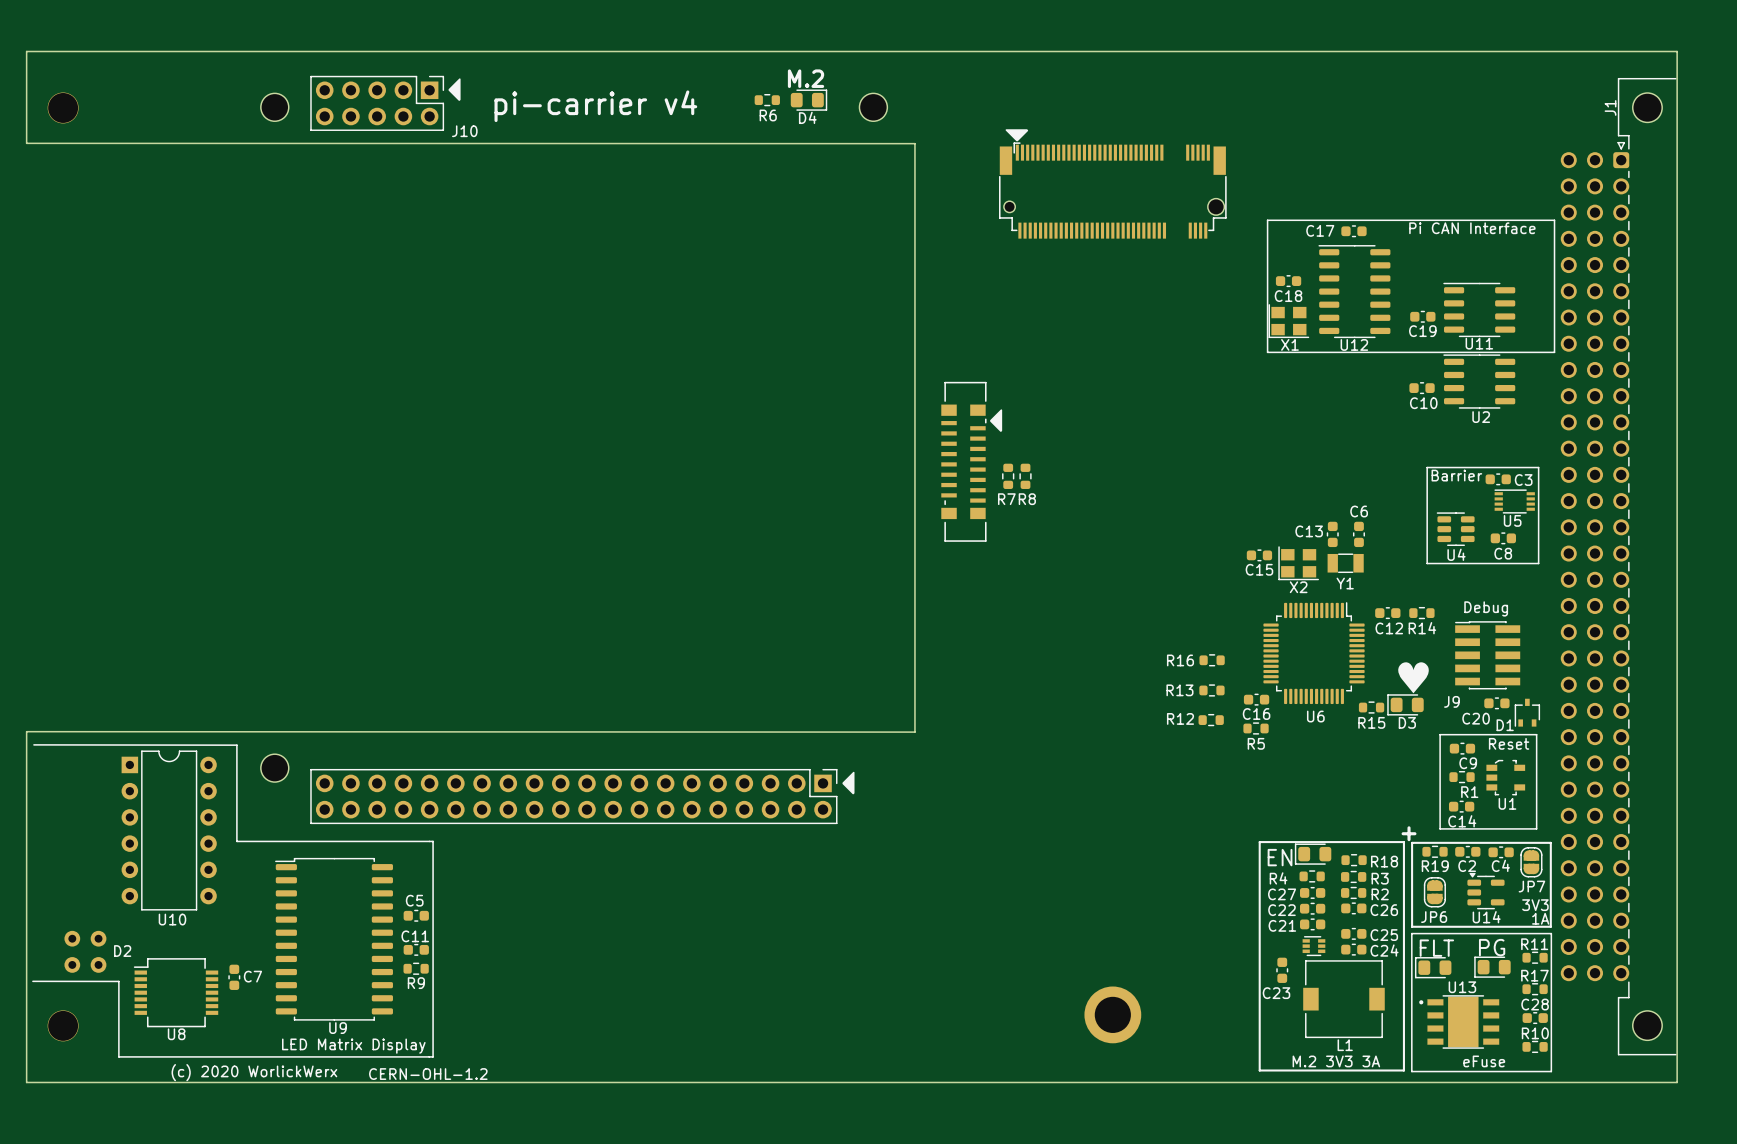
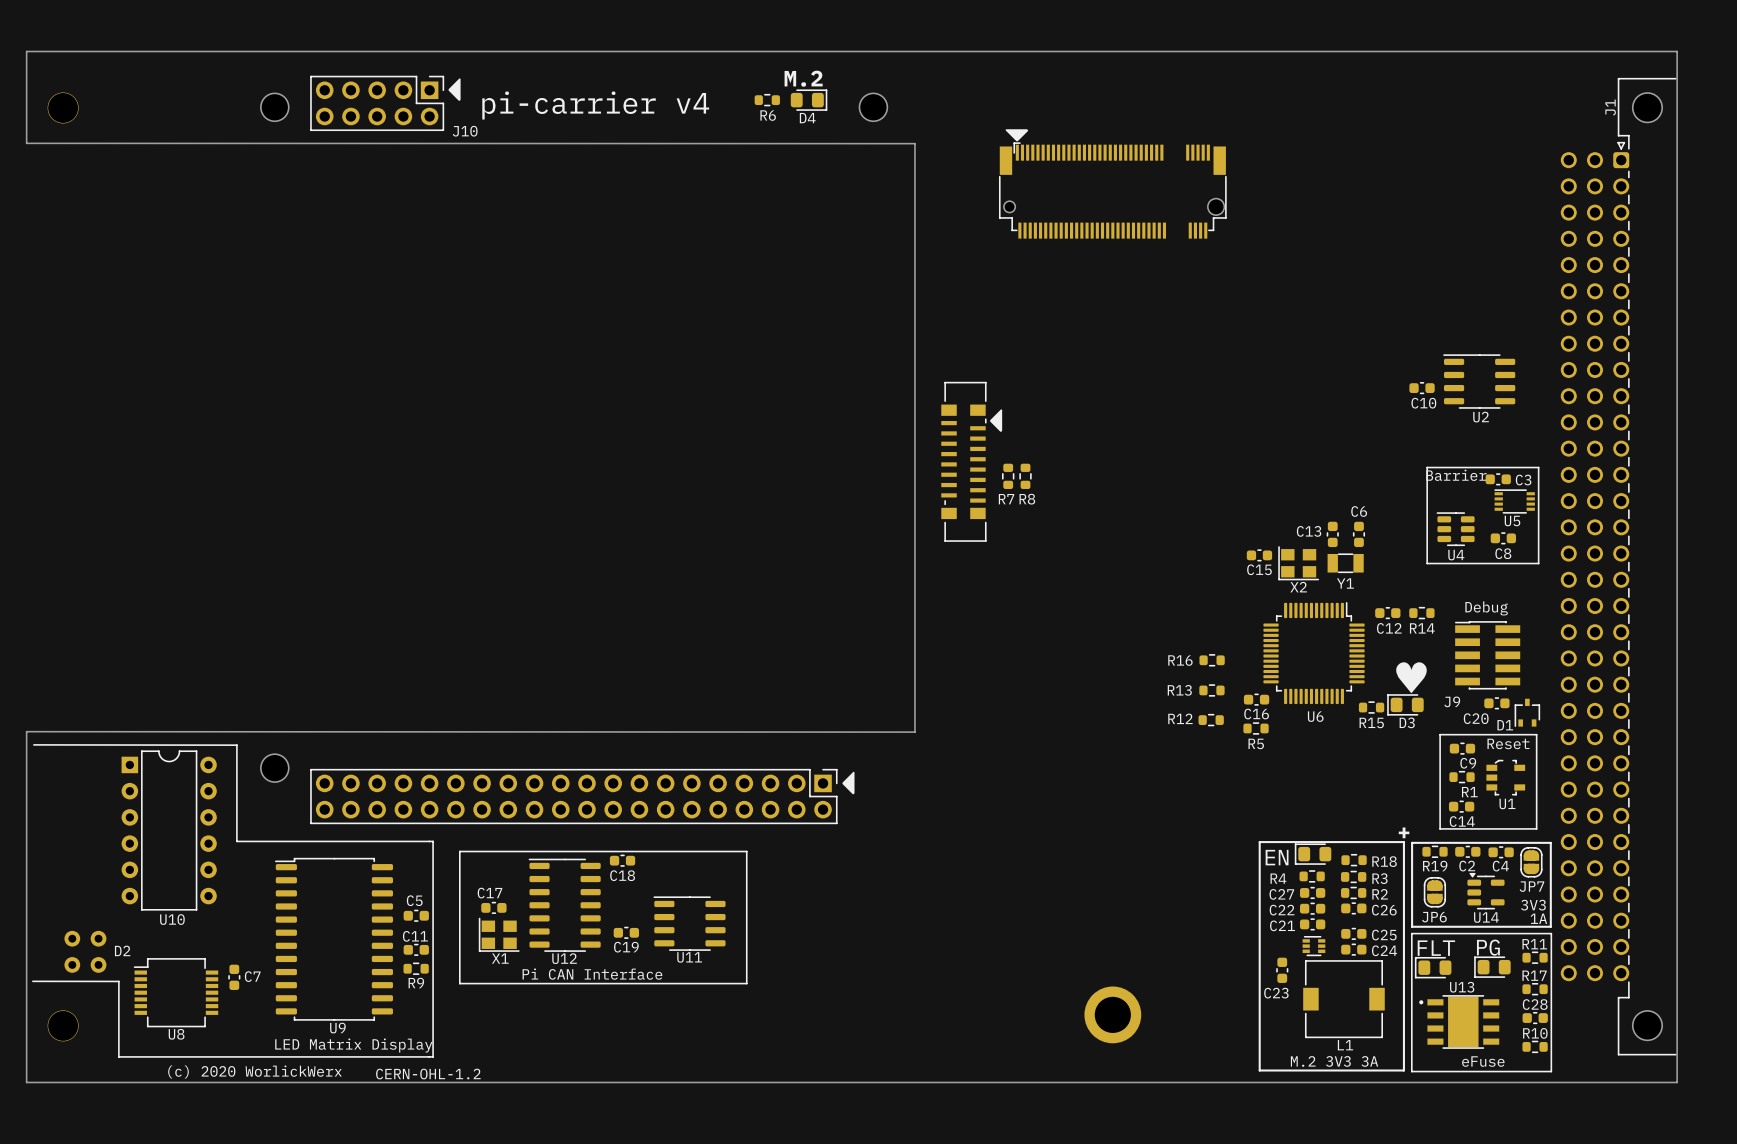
line: (1267, 220) (1554, 220) (1554, 352) (1267, 352) (1267, 220) -> none
text: Pi CAN Interface (1472, 228) -> none
C17 name position: C17 (1320, 230) -> C17 (489, 893)
C17 position: (1353, 231) -> (493, 907)
C18 position: (1288, 281) -> (622, 860)
U12 position: (1354, 291) -> (564, 905)
U11 position: (1479, 309) -> (689, 923)
C19 position: (1422, 316) -> (626, 932)
X1 position: (1288, 321) -> (499, 934)
line: none -> (459, 851) (746, 851) (746, 983) (459, 983) (459, 851)
text: none -> Pi CAN Interface (592, 974)

